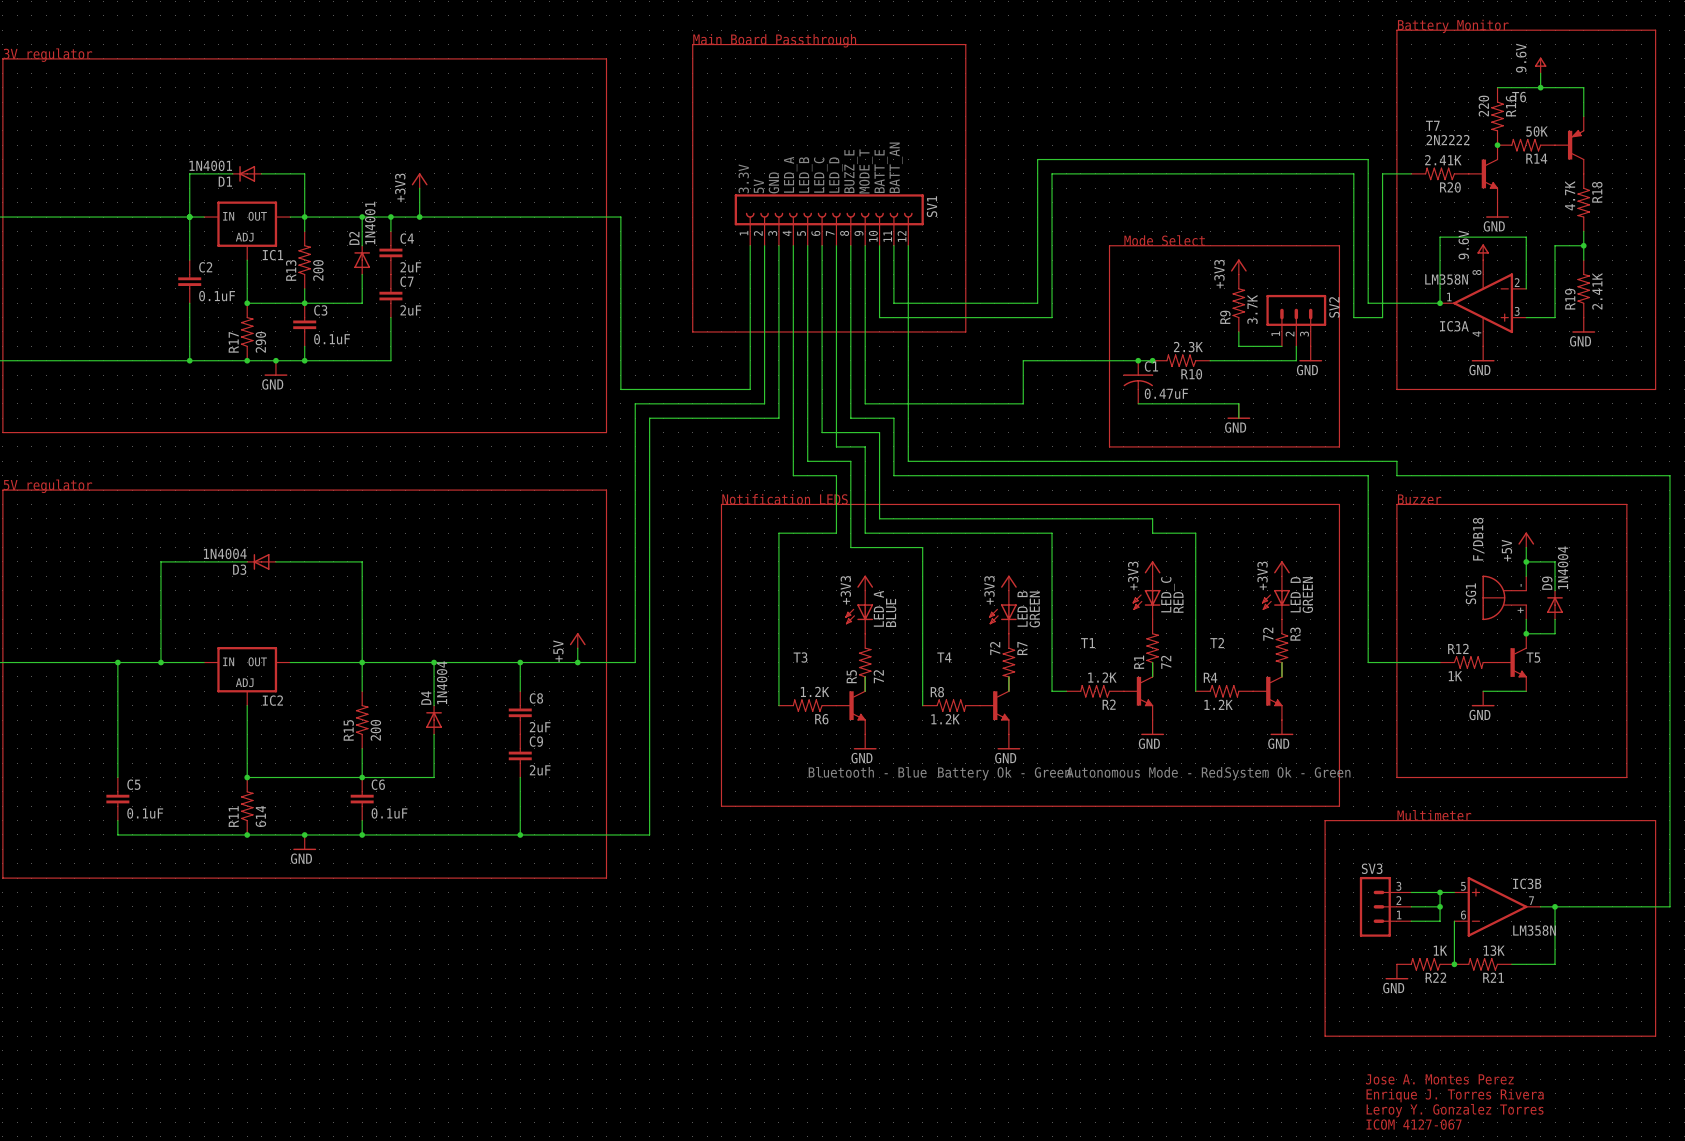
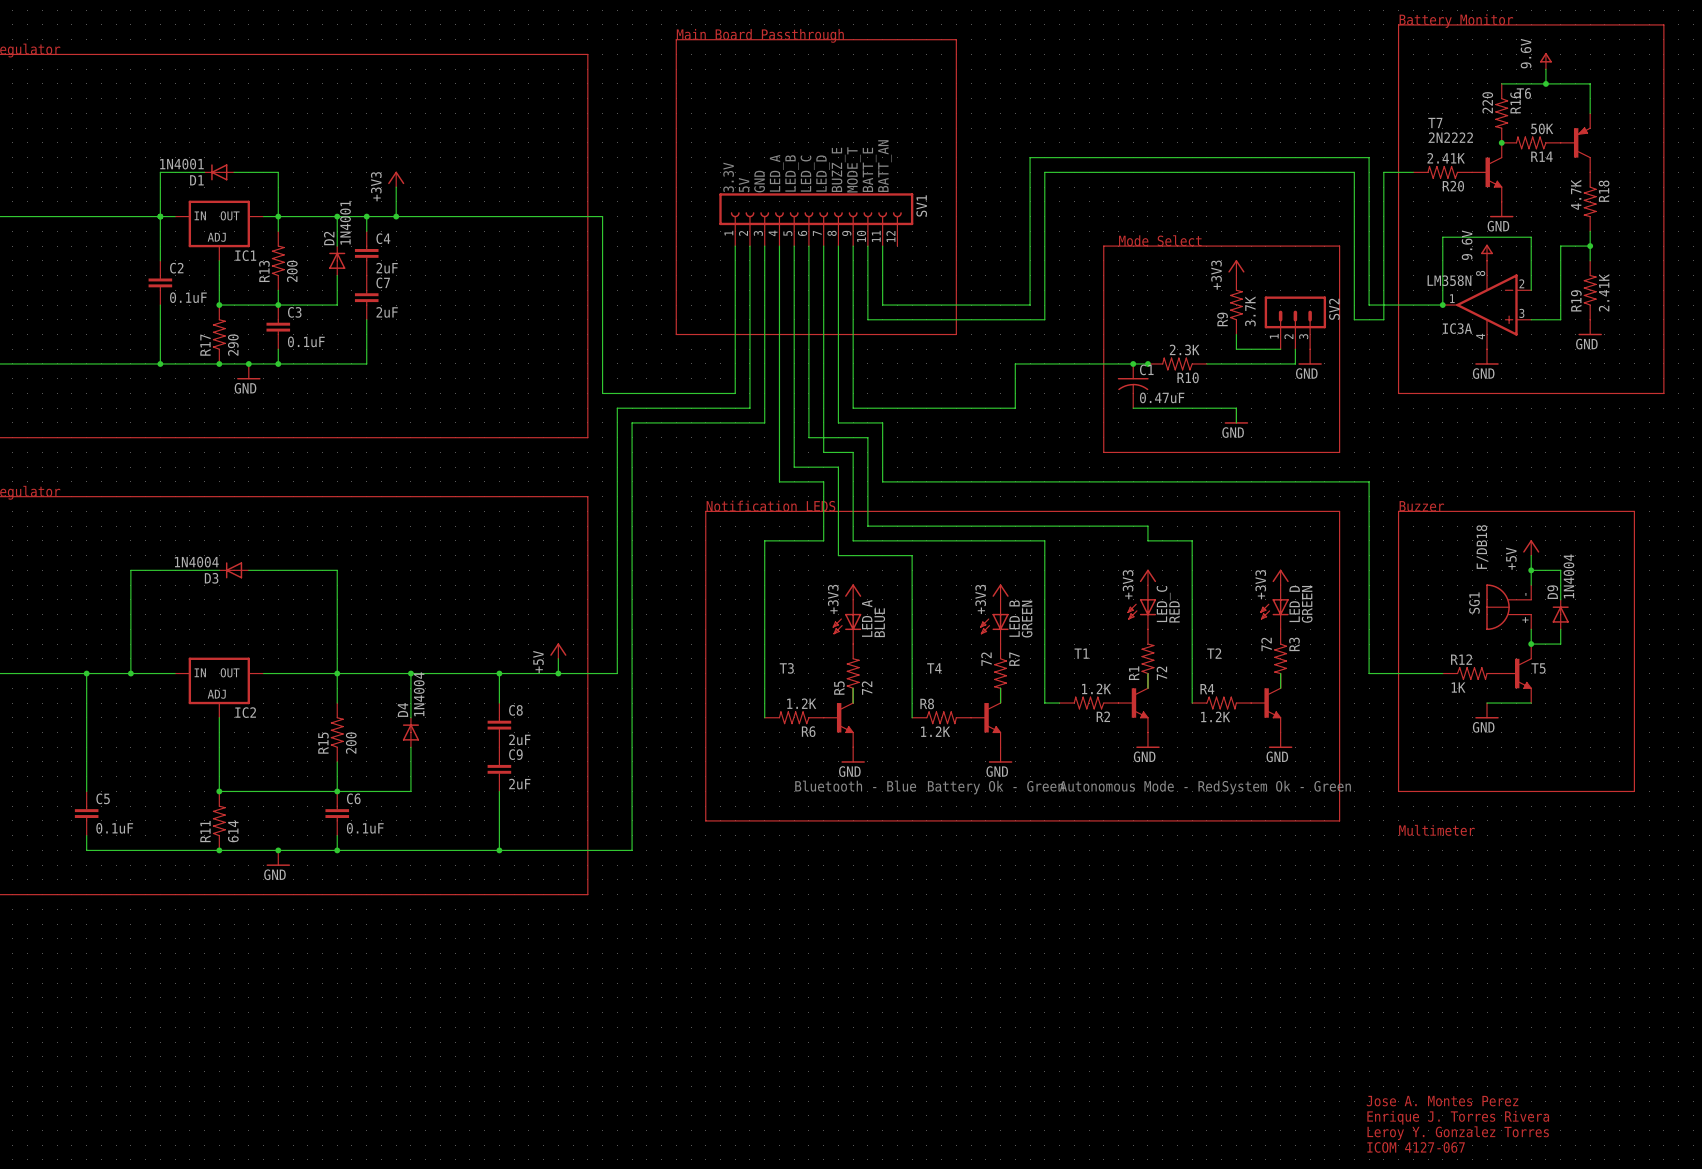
wire: (908, 245) (908, 461) (1396, 461) (1396, 475) (1669, 475) (1669, 906) (1540, 906) -> none
line: (1325, 820) (1325, 1036) (1655, 1036) (1655, 820) (1325, 820) -> none
wire: (1411, 892) (1454, 892) -> none
wire: (1440, 892) (1440, 921) (1411, 921) -> none
junction: (1440, 892) -> none
SV3: (1385, 906) -> none
wire: (1411, 906) (1440, 906) -> none
junction: (1440, 906) -> none
IC3B: LM358N (1497, 906) -> none
wire: (1555, 906) (1555, 964) (1511, 964) -> none
junction: (1555, 906) -> none
wire: (1454, 921) (1454, 964) -> none
R22: 1K (1425, 964) -> none
junction: (1454, 964) -> none
R21: 13K (1483, 964) -> none
power symbol: GND (1396, 971) -> none

